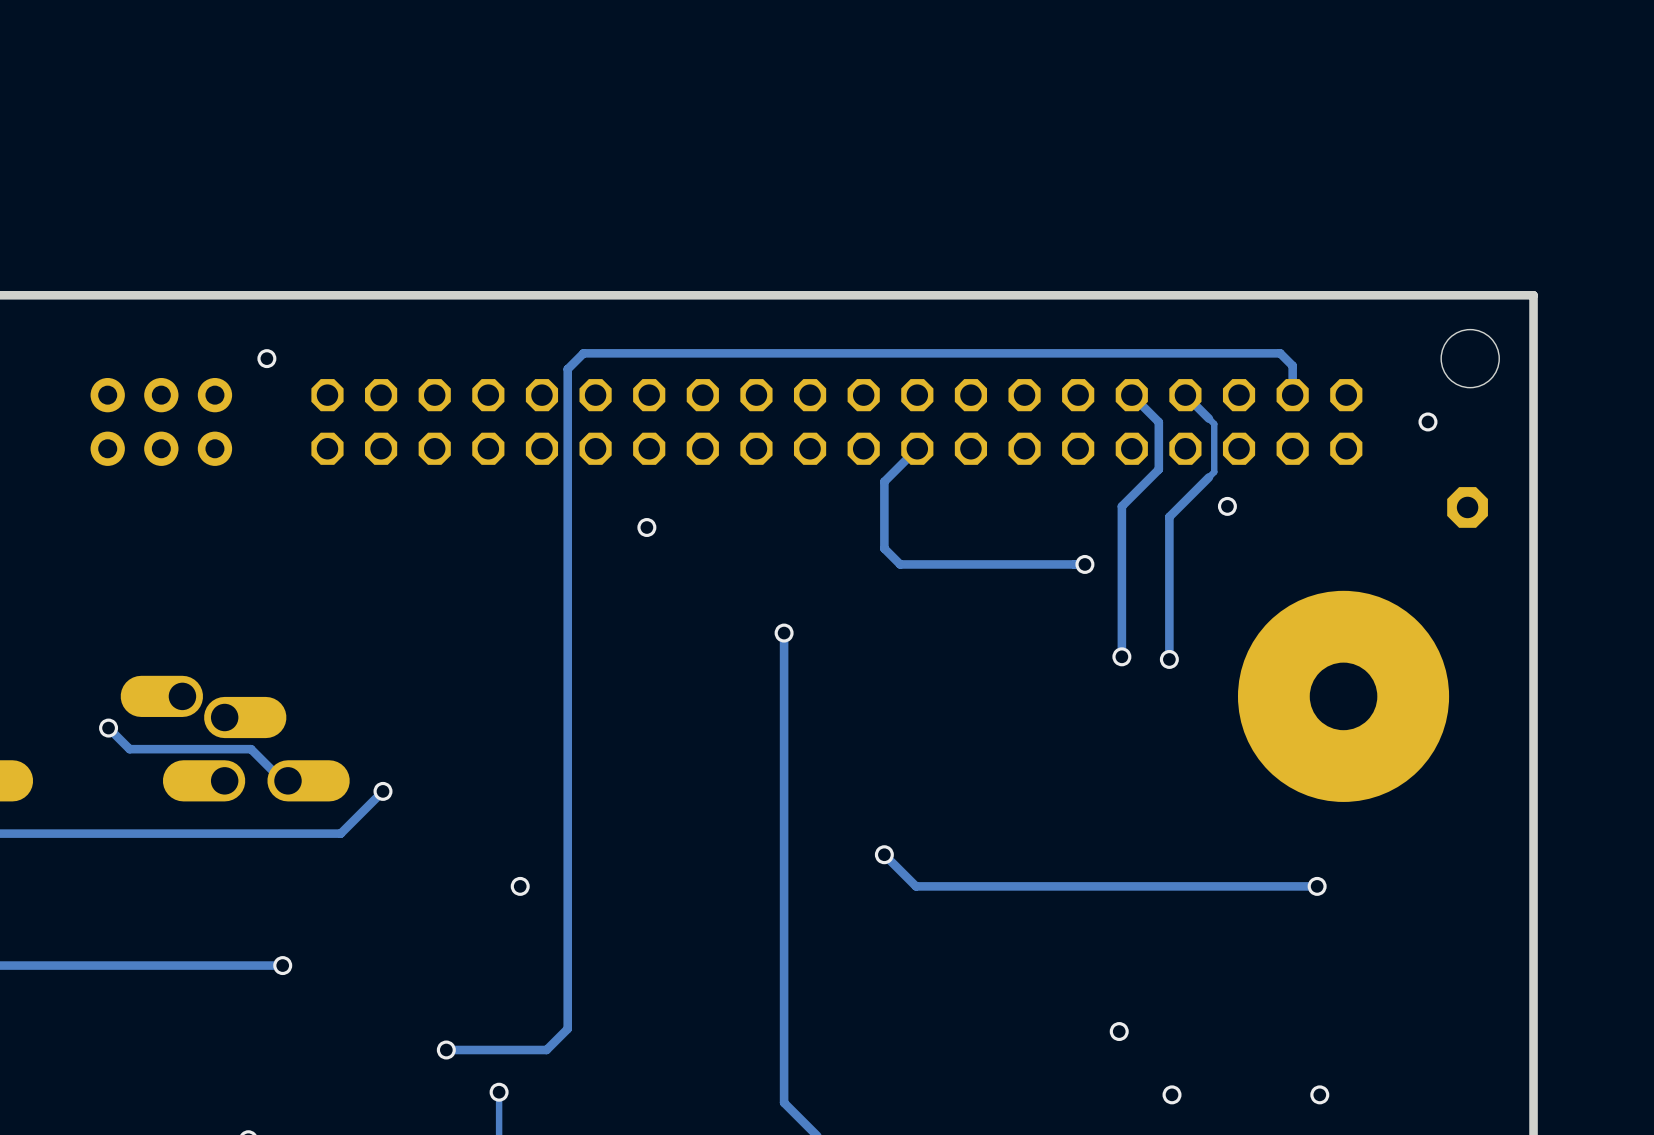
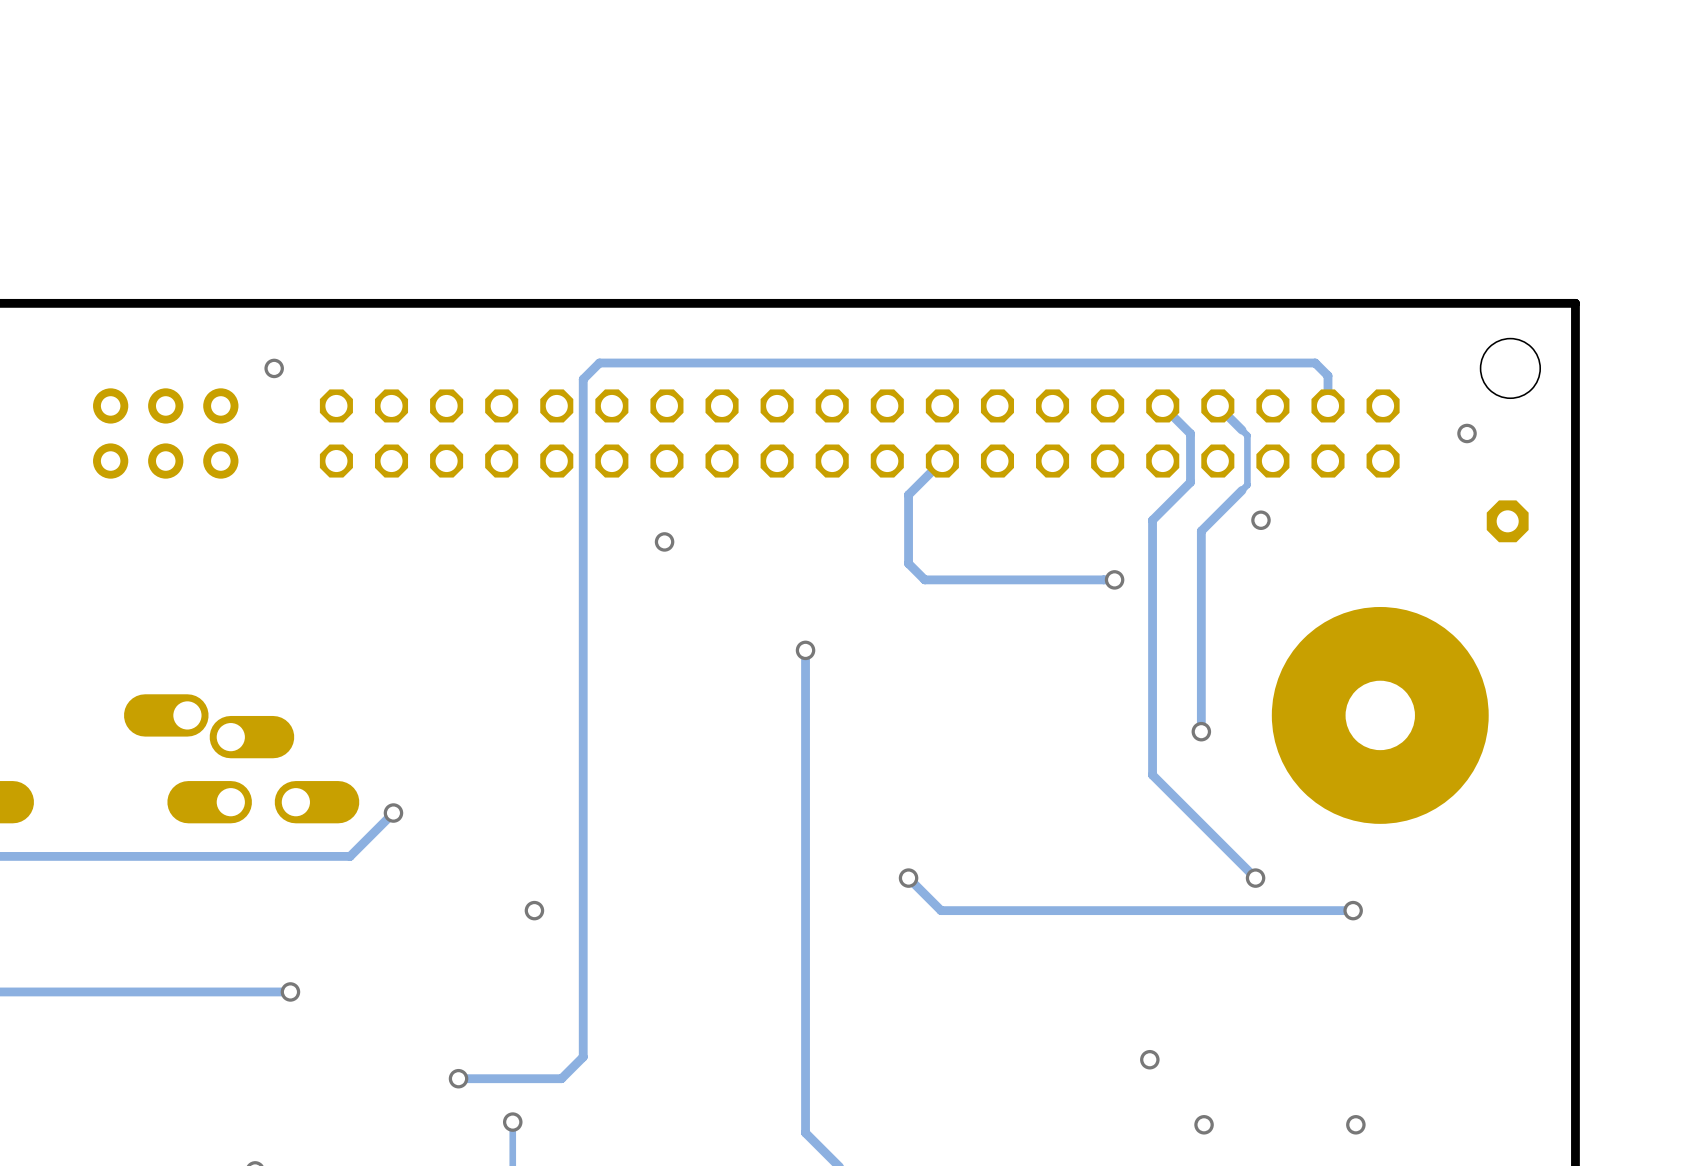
track: none -> (1152, 674) (1152, 775) (1255, 878)
via: (1121, 656) -> none
track: none -> (1201, 677) (1201, 731)
via: (1169, 659) -> none
via: none -> (1201, 731)
track: (108, 728) (129, 749) (251, 749) (282, 780) (288, 780) -> none
via: (108, 728) -> none
via: none -> (1255, 878)

